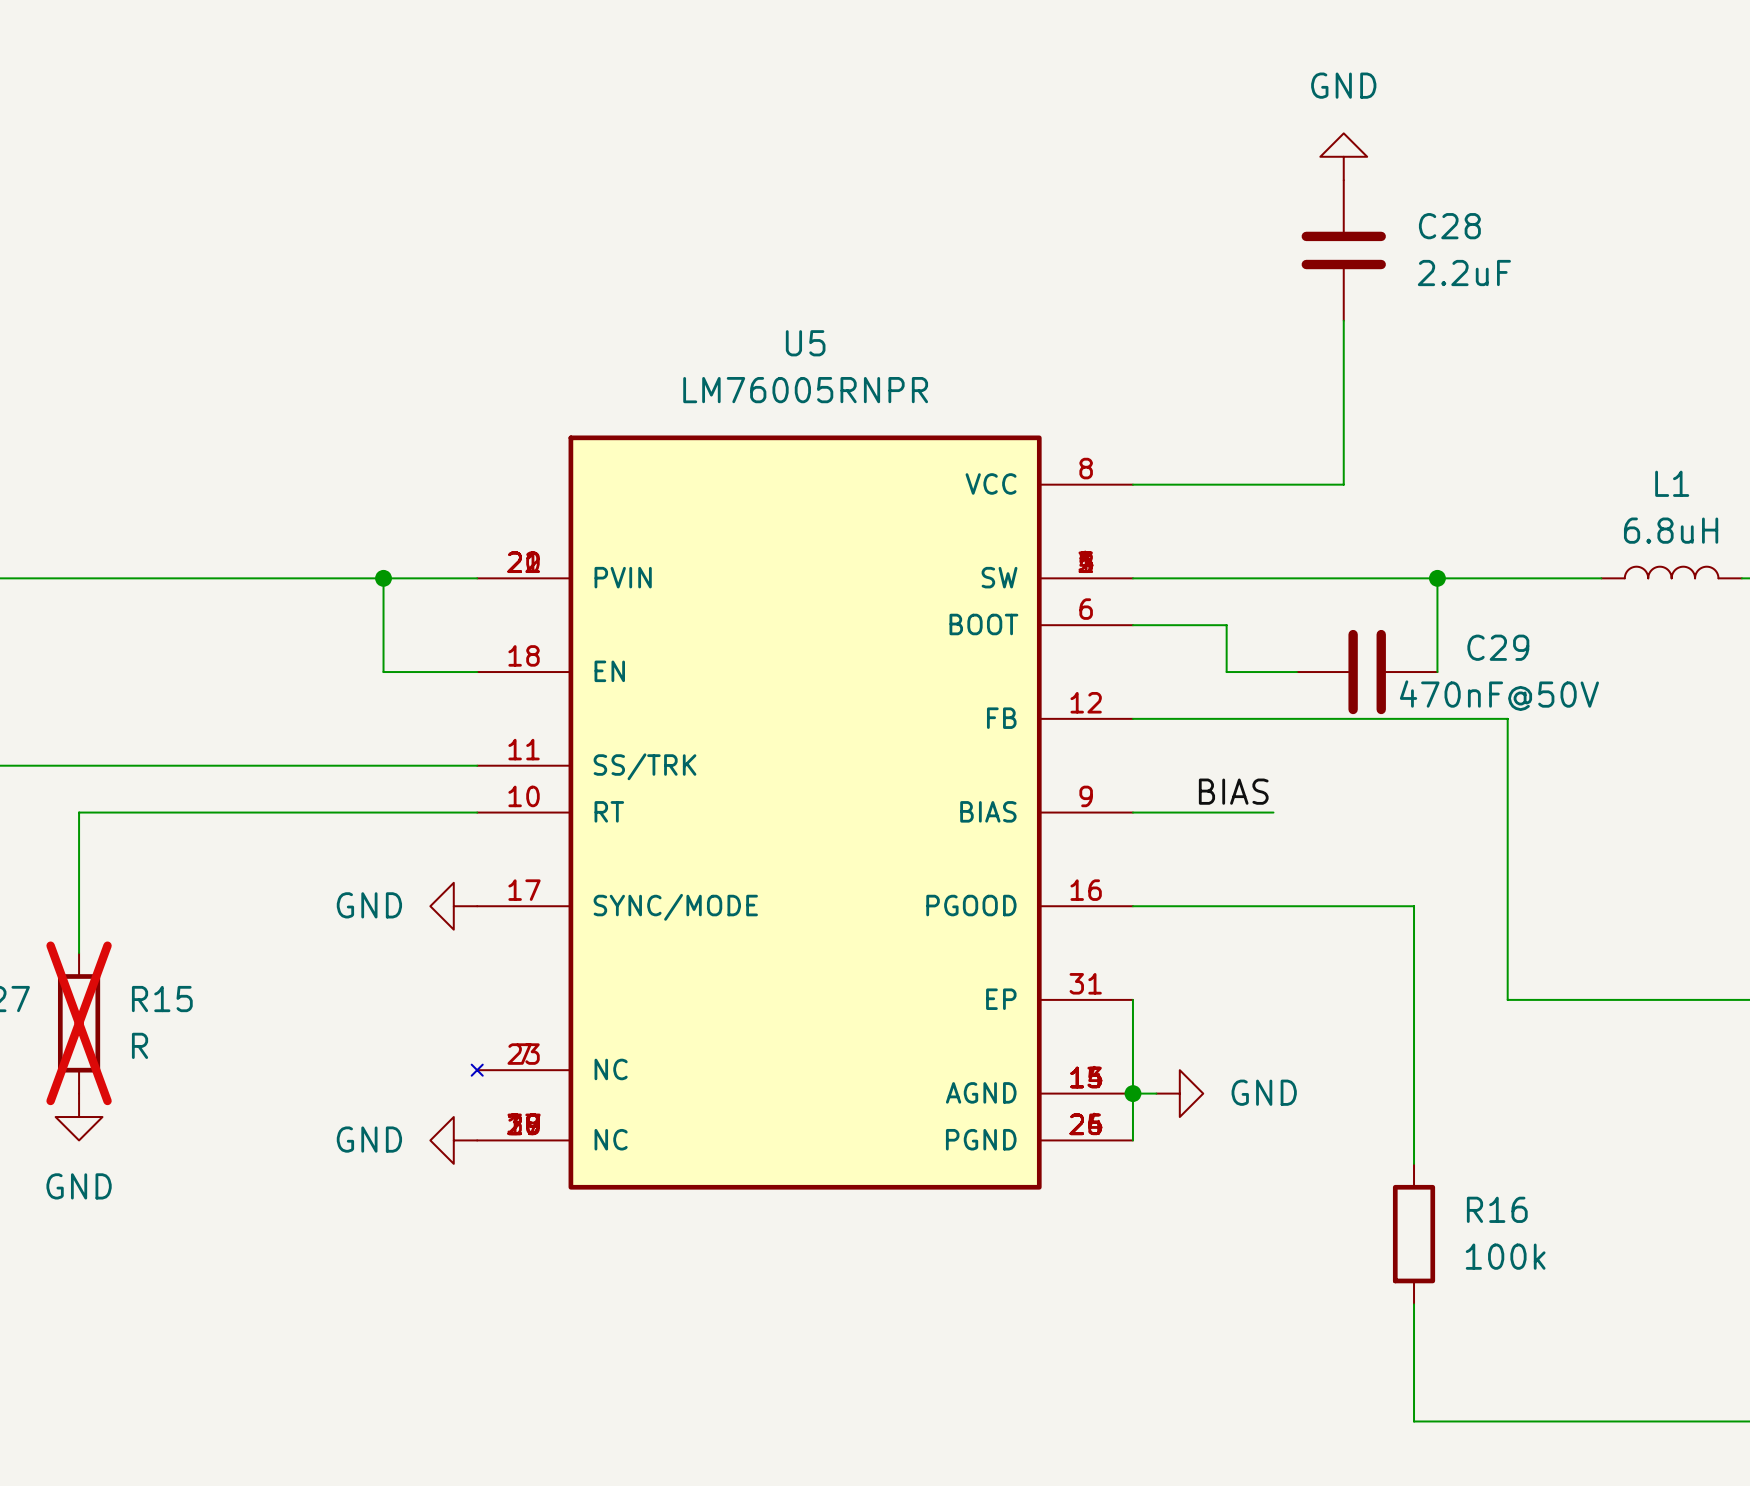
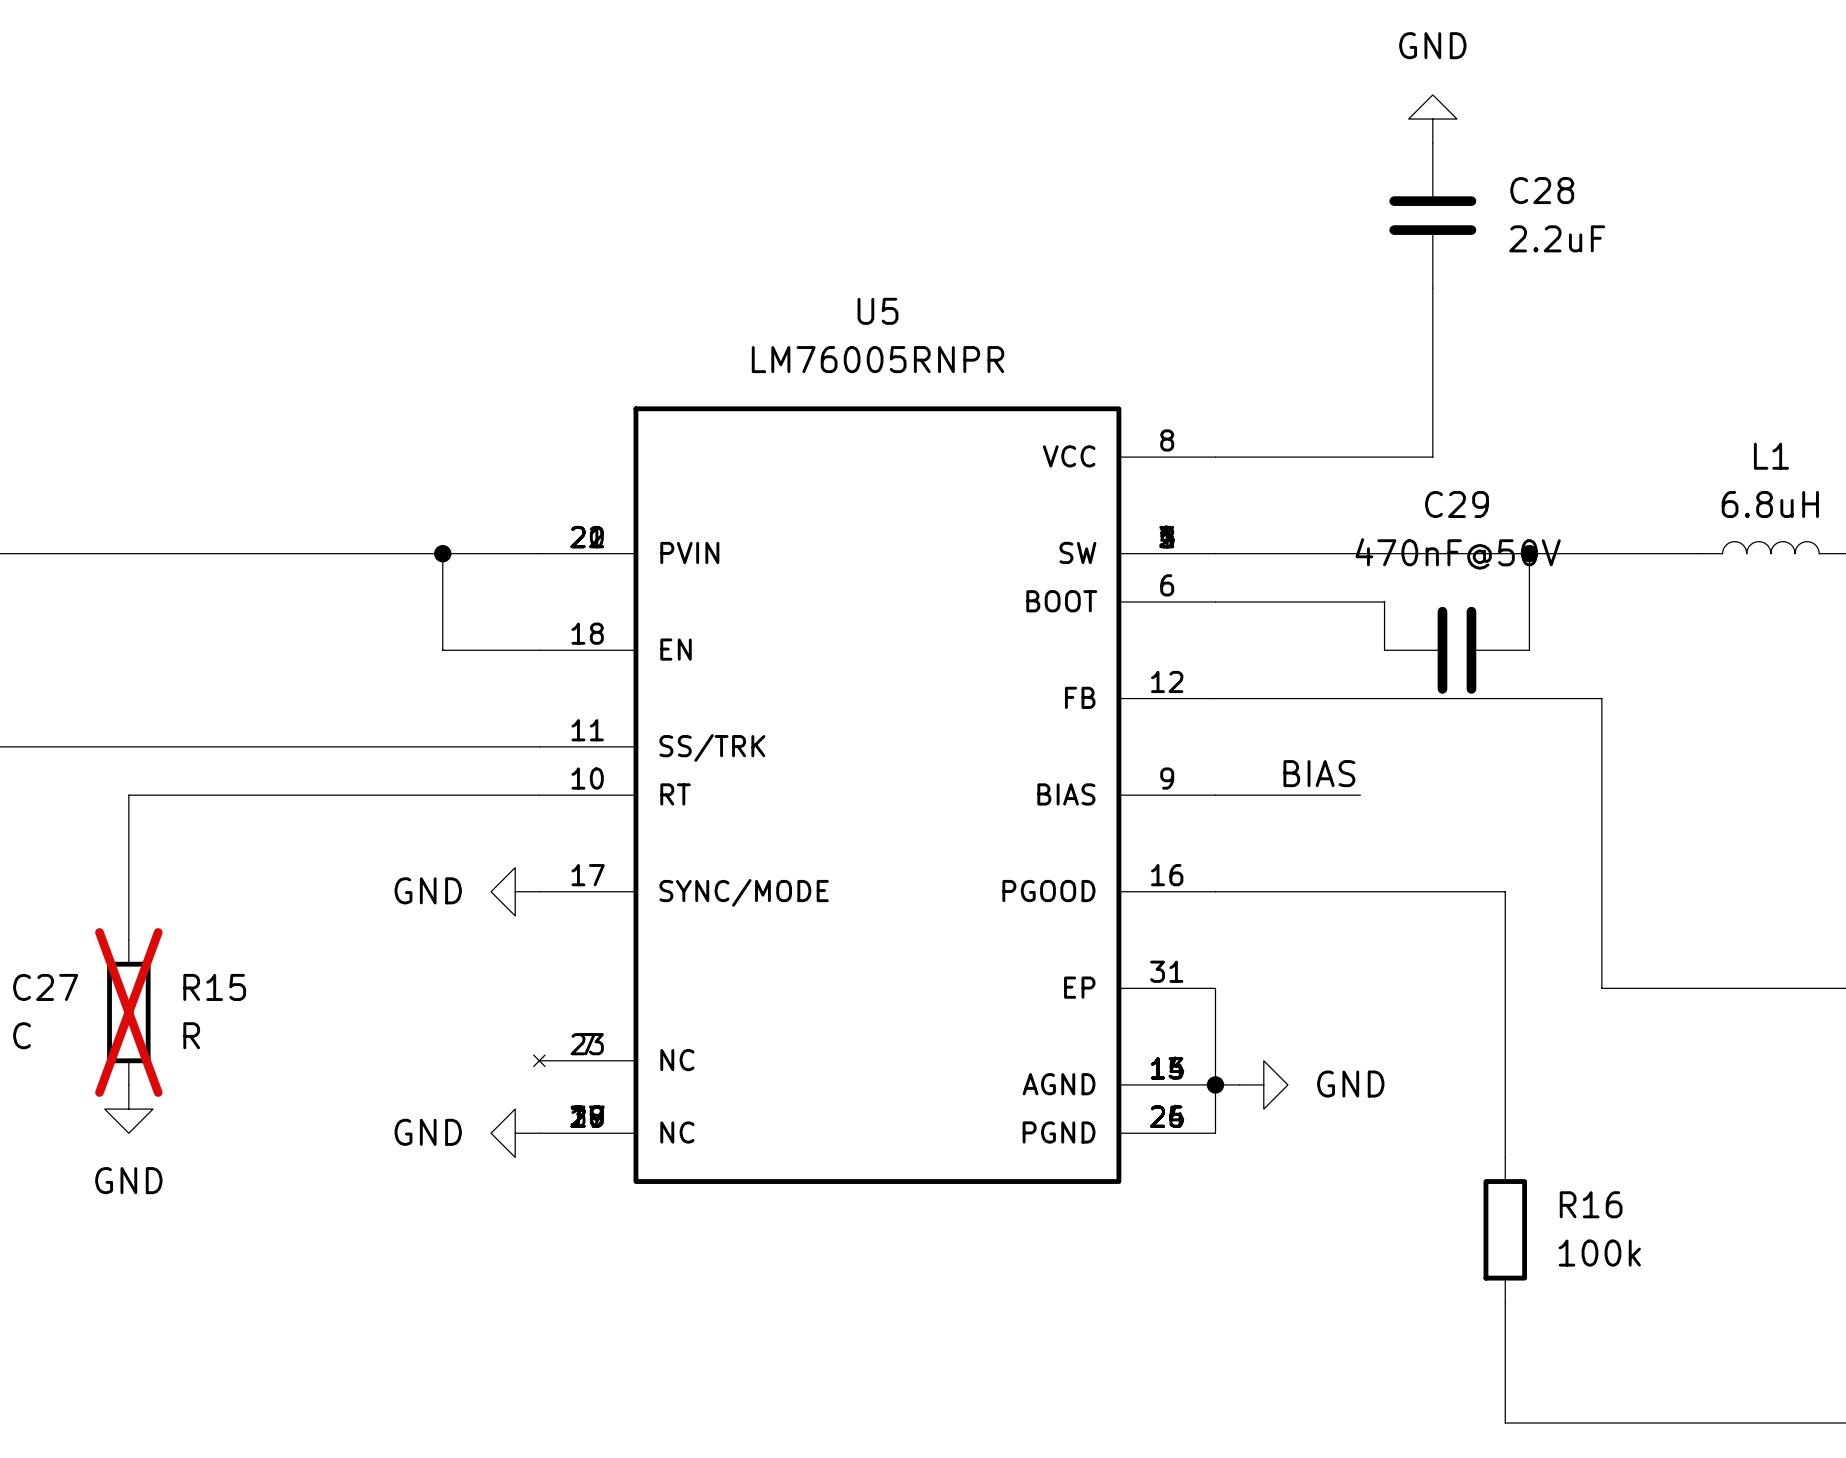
wire: (1226, 625) (1226, 672) (1296, 672) -> (1312, 601) (1384, 601) (1384, 650)
C29 name position: C29 (1498, 647) -> C29 (1456, 504)
C29 value position: 470nF@50V (1499, 695) -> 470nF@50V (1458, 553)

